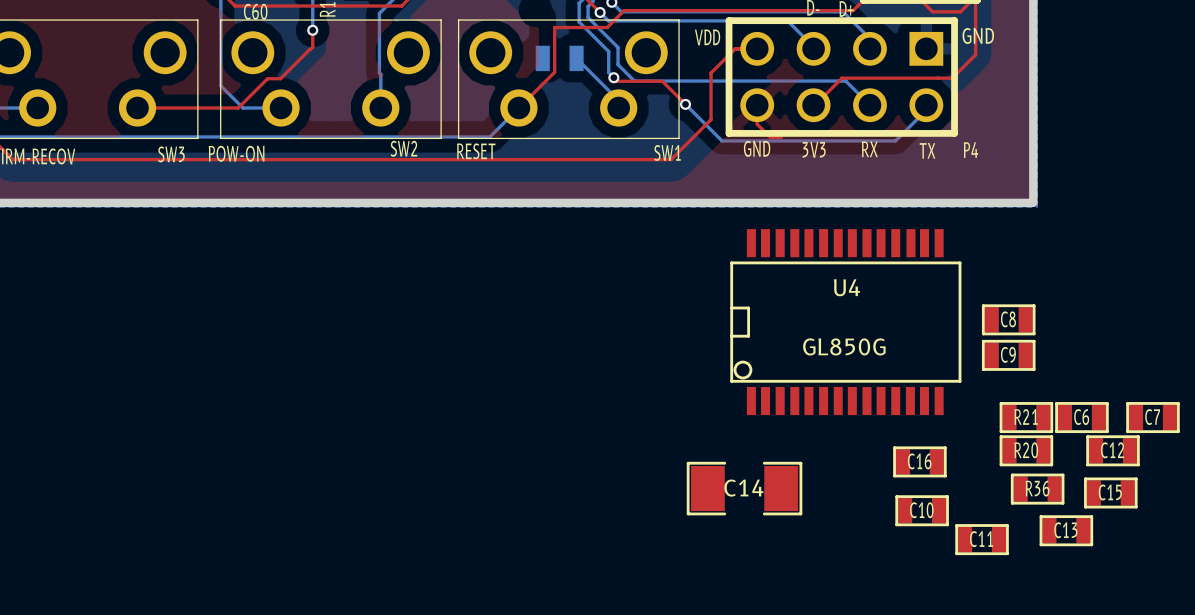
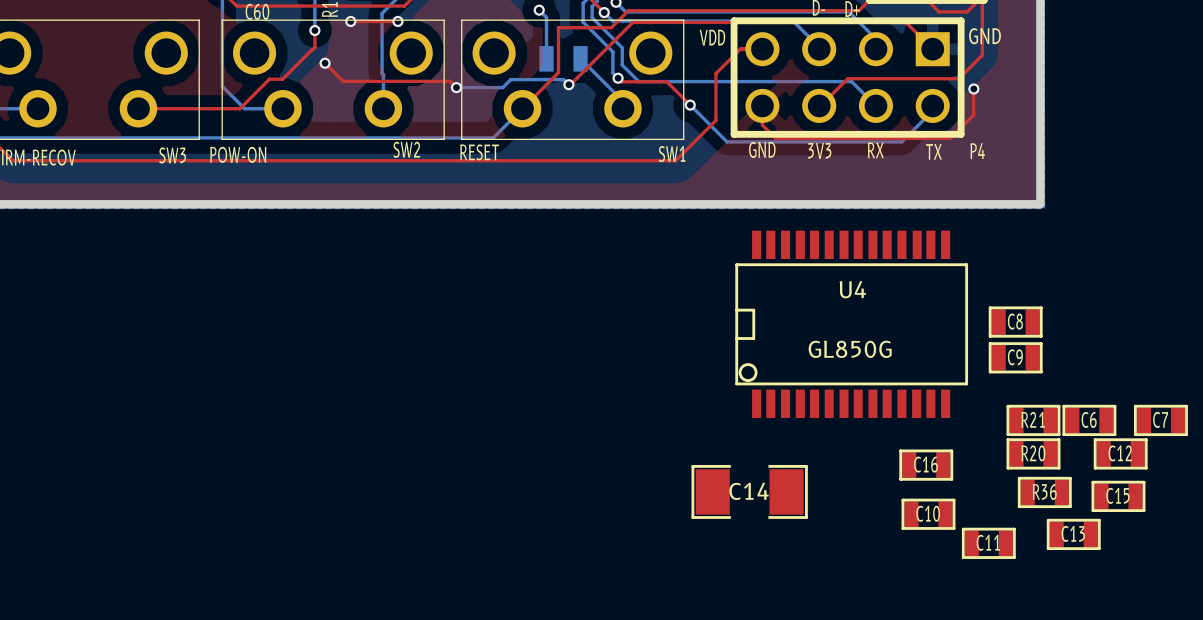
bottom track: none -> (539, 10) (546, 17) (546, 58)
via: none -> (539, 10)
top track: none -> (350, 21) (397, 21)
via: none -> (350, 21)
via: none -> (397, 21)
top track: none -> (932, 49) (905, 22) (632, 22) (568, 84)
top track: none -> (325, 63) (343, 81) (450, 81) (456, 87)
via: none -> (325, 63)
bottom track: none -> (568, 84) (563, 79) (510, 79) (502, 87) (456, 87)
via: none -> (568, 84)
via: none -> (456, 87)
top track: none -> (973, 89) (973, 115) (950, 138) (786, 138)
via: none -> (973, 88)

